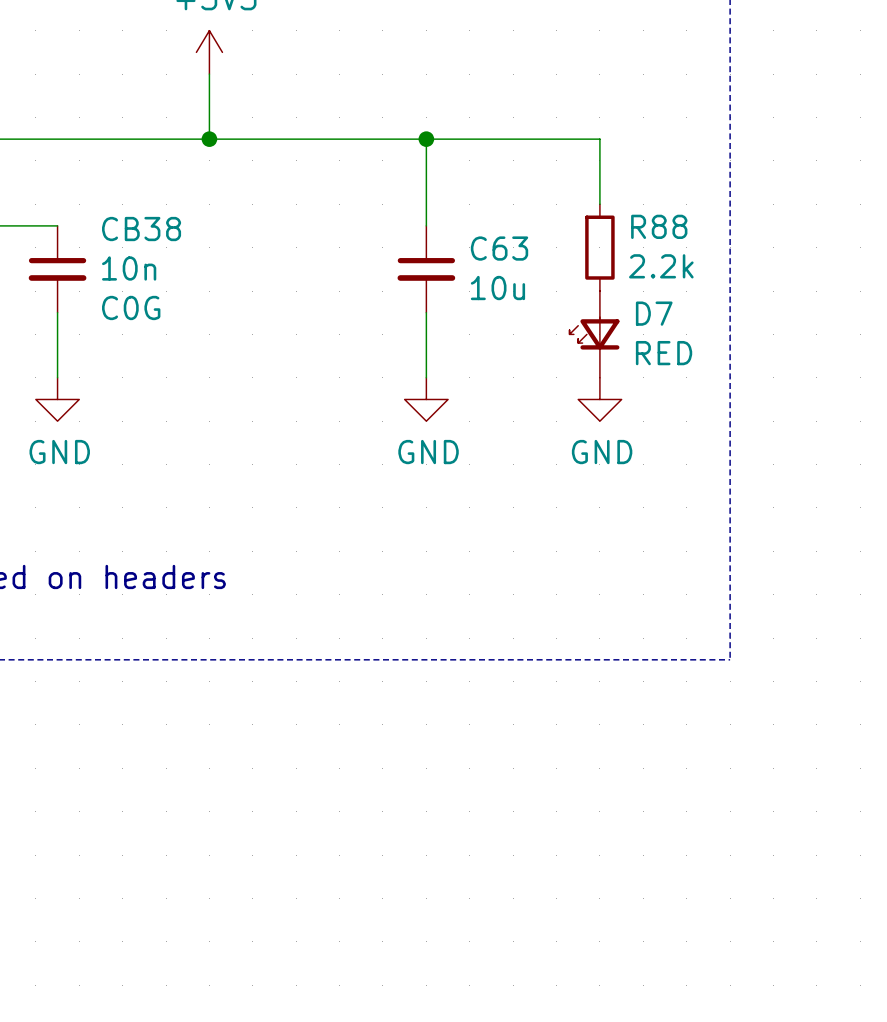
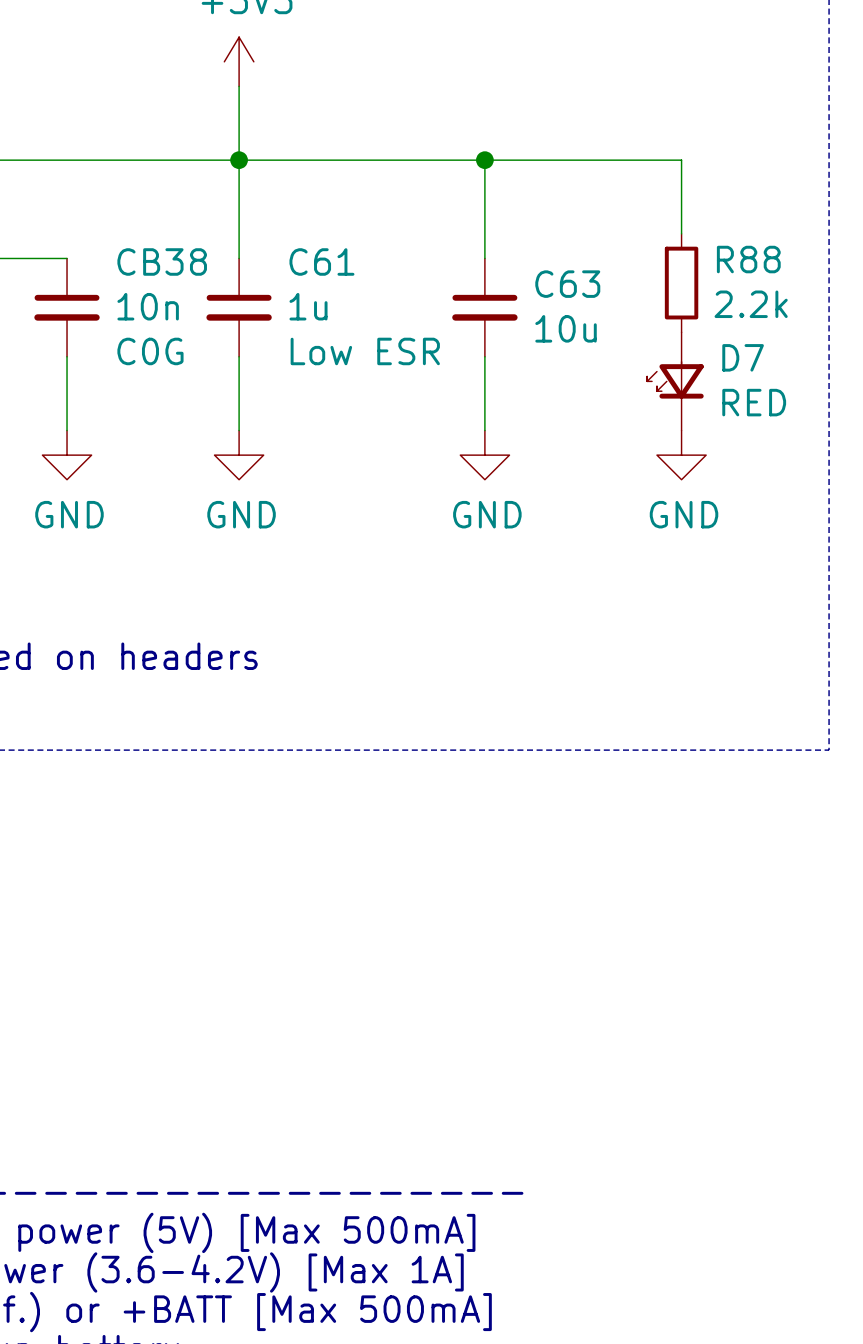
wire: none -> (239, 160) (239, 258)
C61: none -> 1u (239, 307)
wire: none -> (239, 356) (239, 430)
power symbol: none -> GND (239, 455)

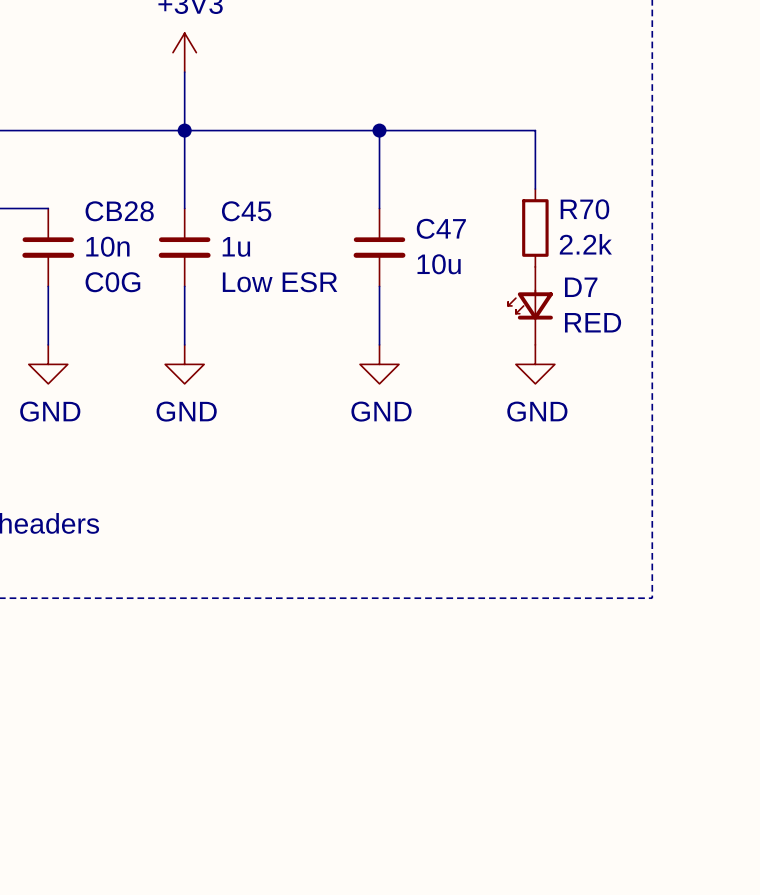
R88 name: R88 (748, 259) -> R70 (584, 209)
CB38 name: CB38 (162, 261) -> CB28 (119, 211)
C61 name: C61 (321, 261) -> C45 (246, 211)
C63 name: C63 (567, 284) -> C47 (441, 228)

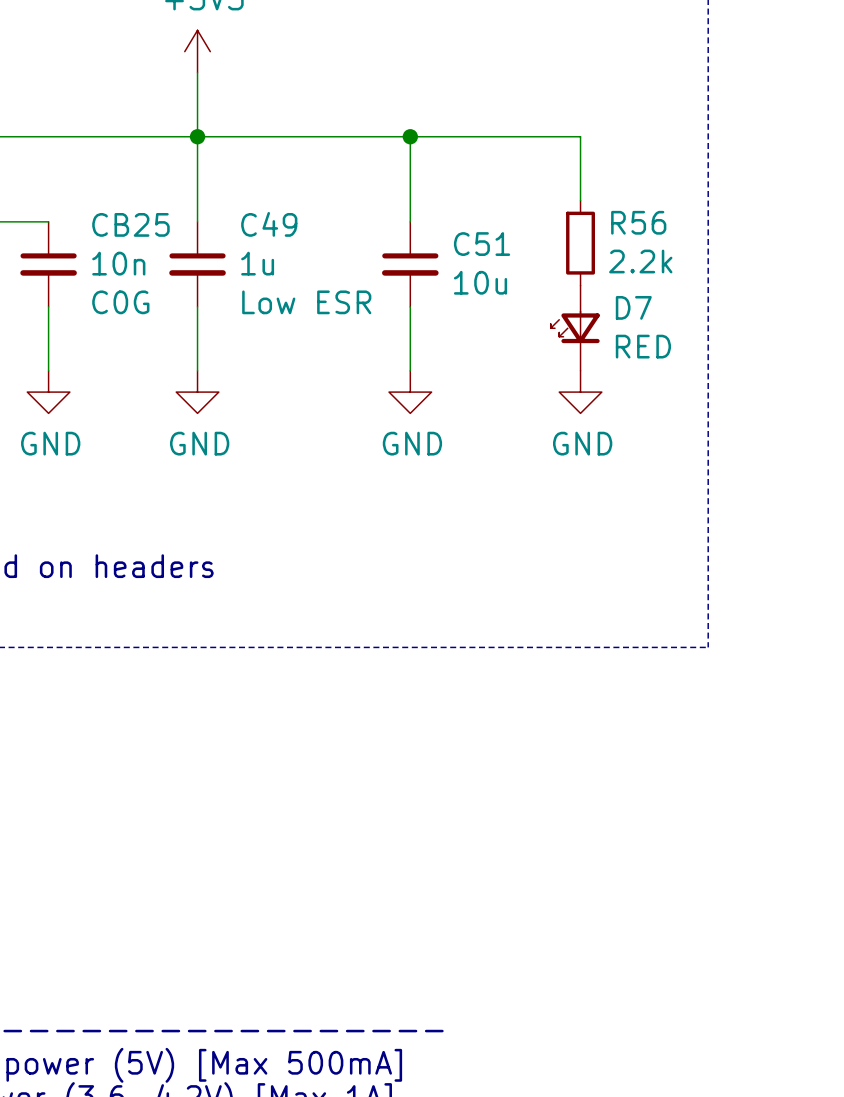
R70 name: R70 (584, 209) -> R56 (638, 222)
CB28 name: CB28 (119, 211) -> CB25 (130, 224)
C45 name: C45 (246, 211) -> C49 (269, 224)
C47 name: C47 (441, 228) -> C51 (482, 244)

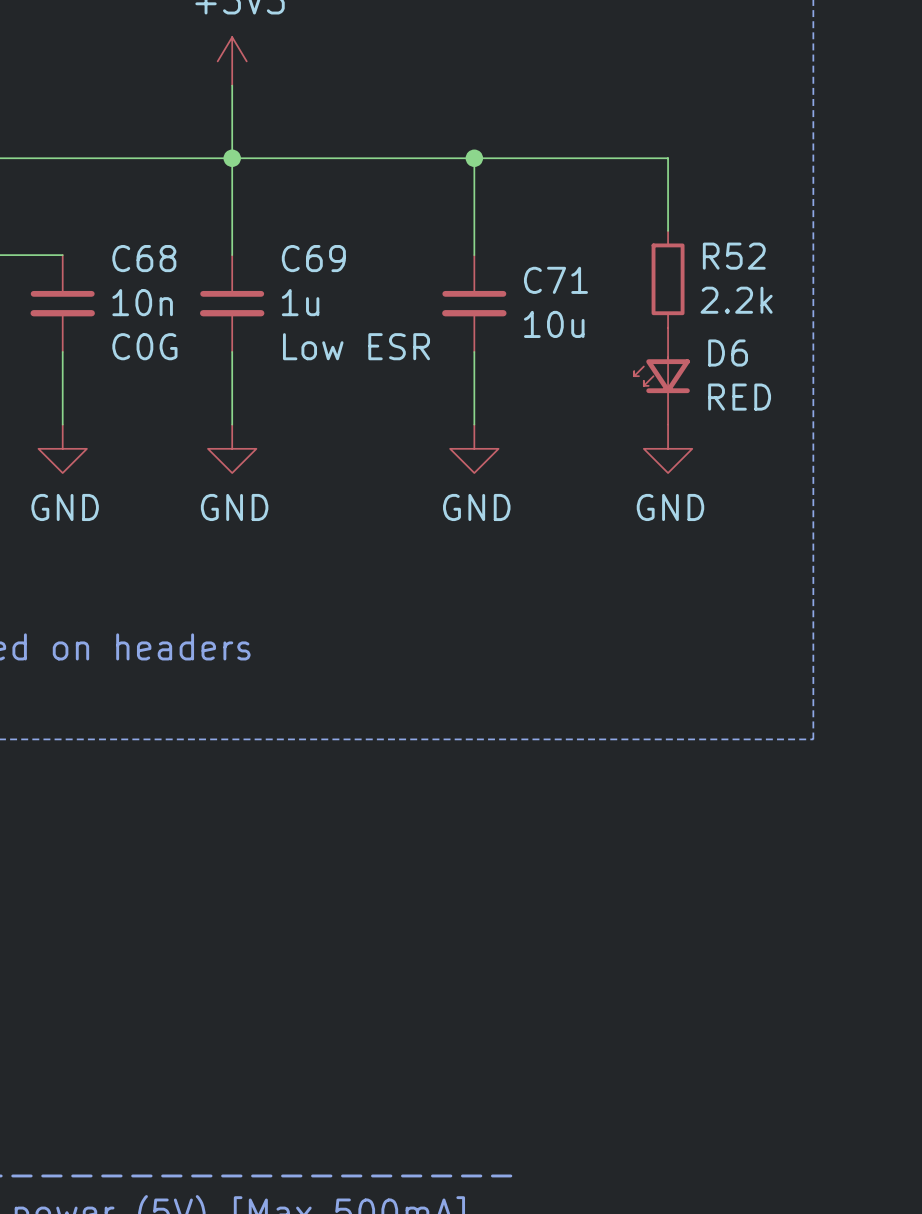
R56 name: R56 (638, 222) -> R52 (734, 256)
CB25 name: CB25 (130, 224) -> C68 (144, 258)
C49 name: C49 (269, 224) -> C69 (313, 258)
C51 name: C51 (482, 244) -> C71 (555, 280)
D7 name: D7 (633, 307) -> D6 (728, 352)

